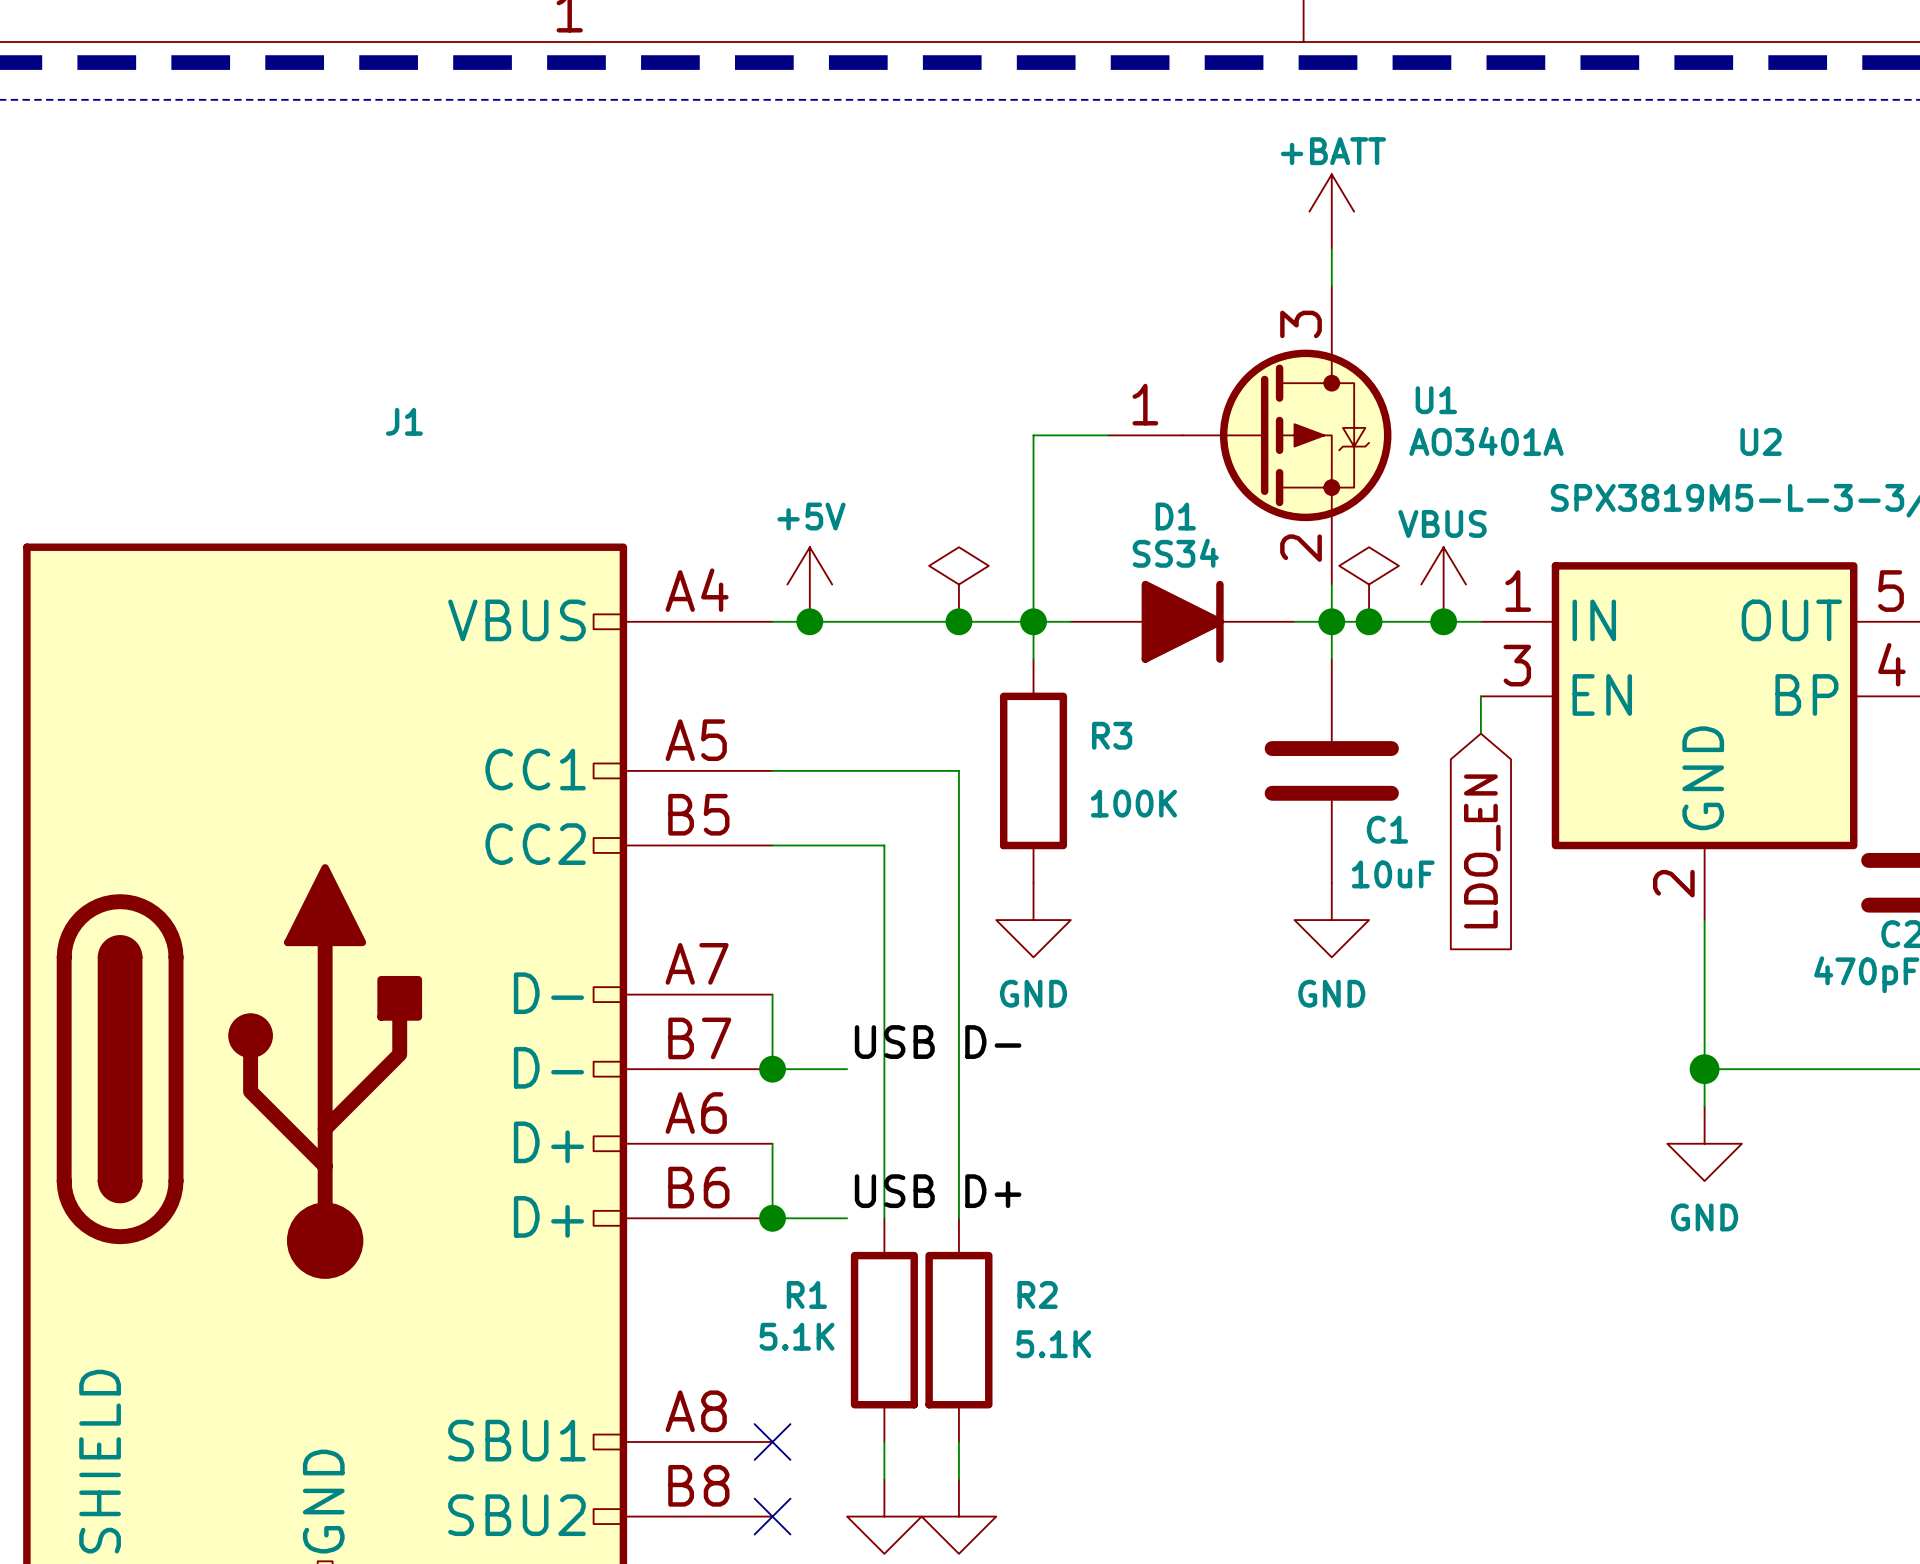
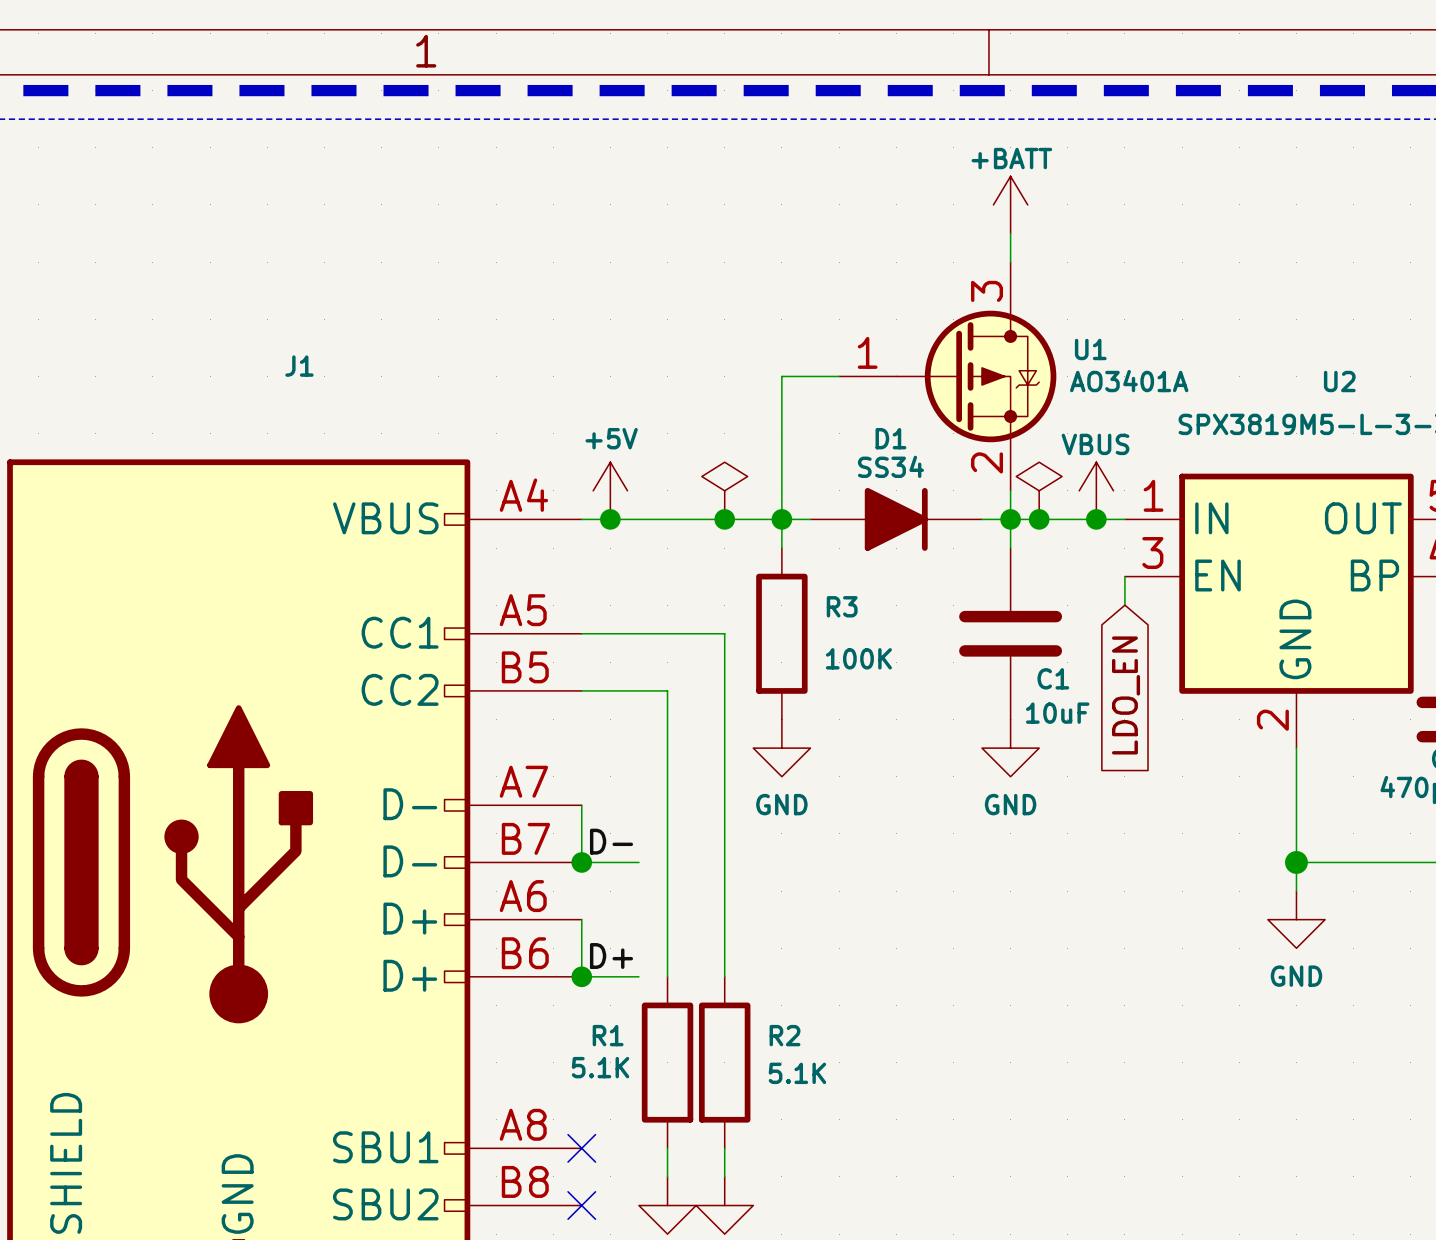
label: USB D- (938, 1042) -> D- (611, 841)
label: USB D+ (938, 1191) -> D+ (611, 956)

